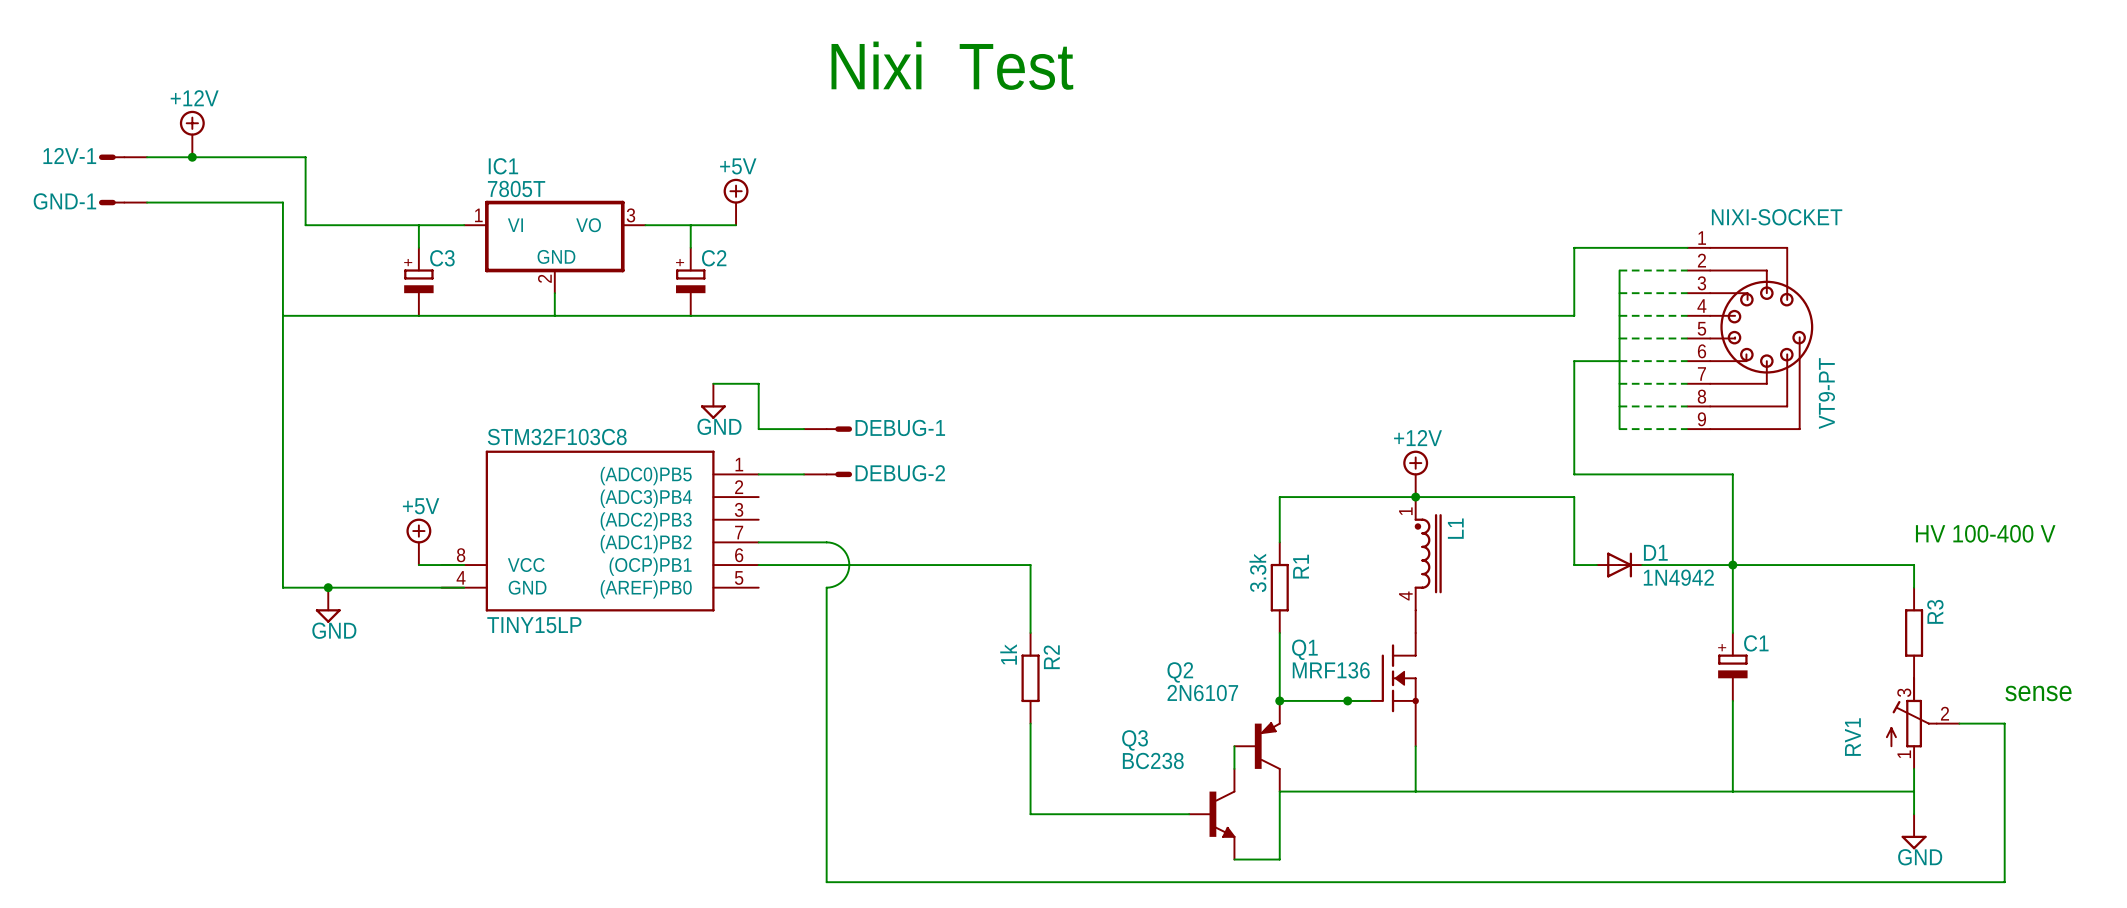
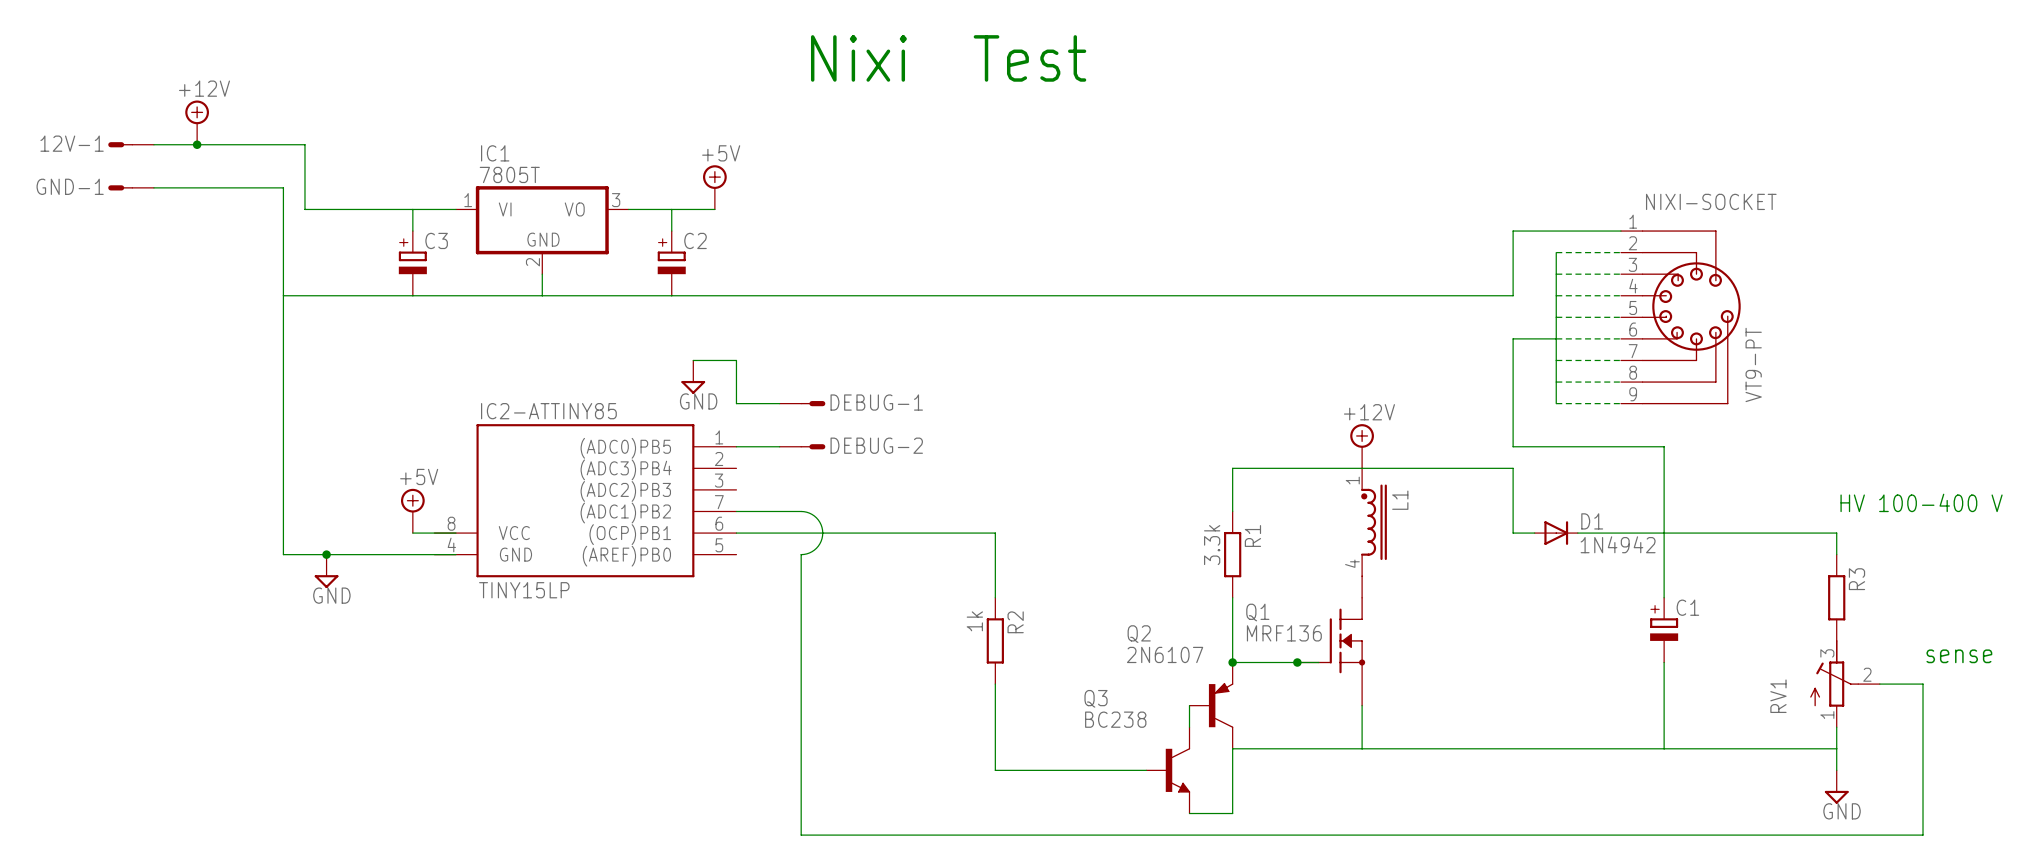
STM32F103C8 name: STM32F103C8 (557, 437) -> IC2-ATTINY85 (548, 411)
junction: (1415, 497) -> none
junction: (1732, 565) -> none

